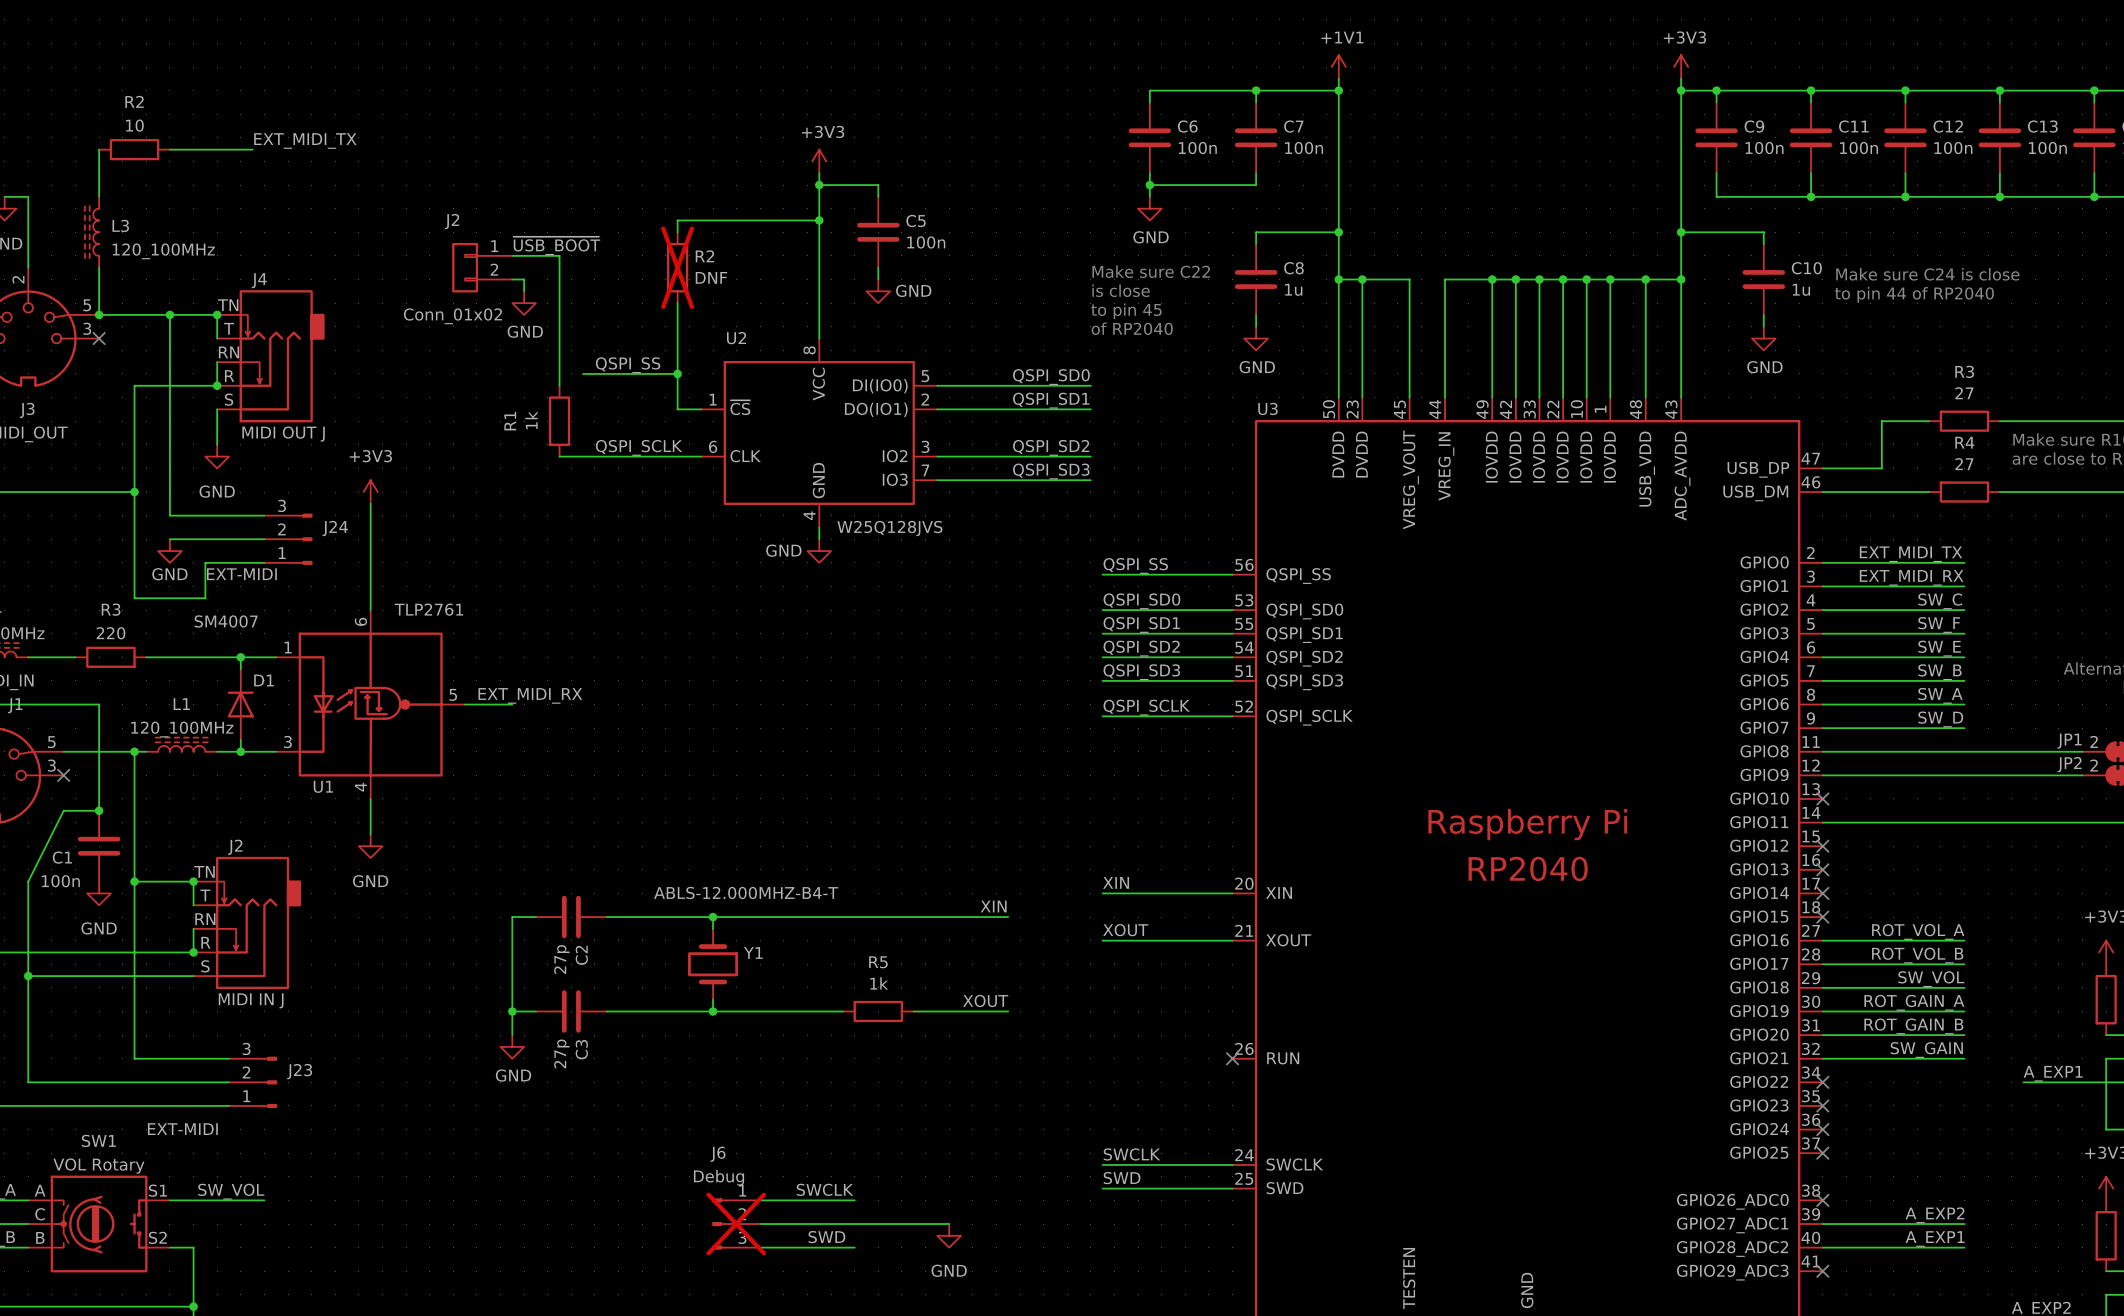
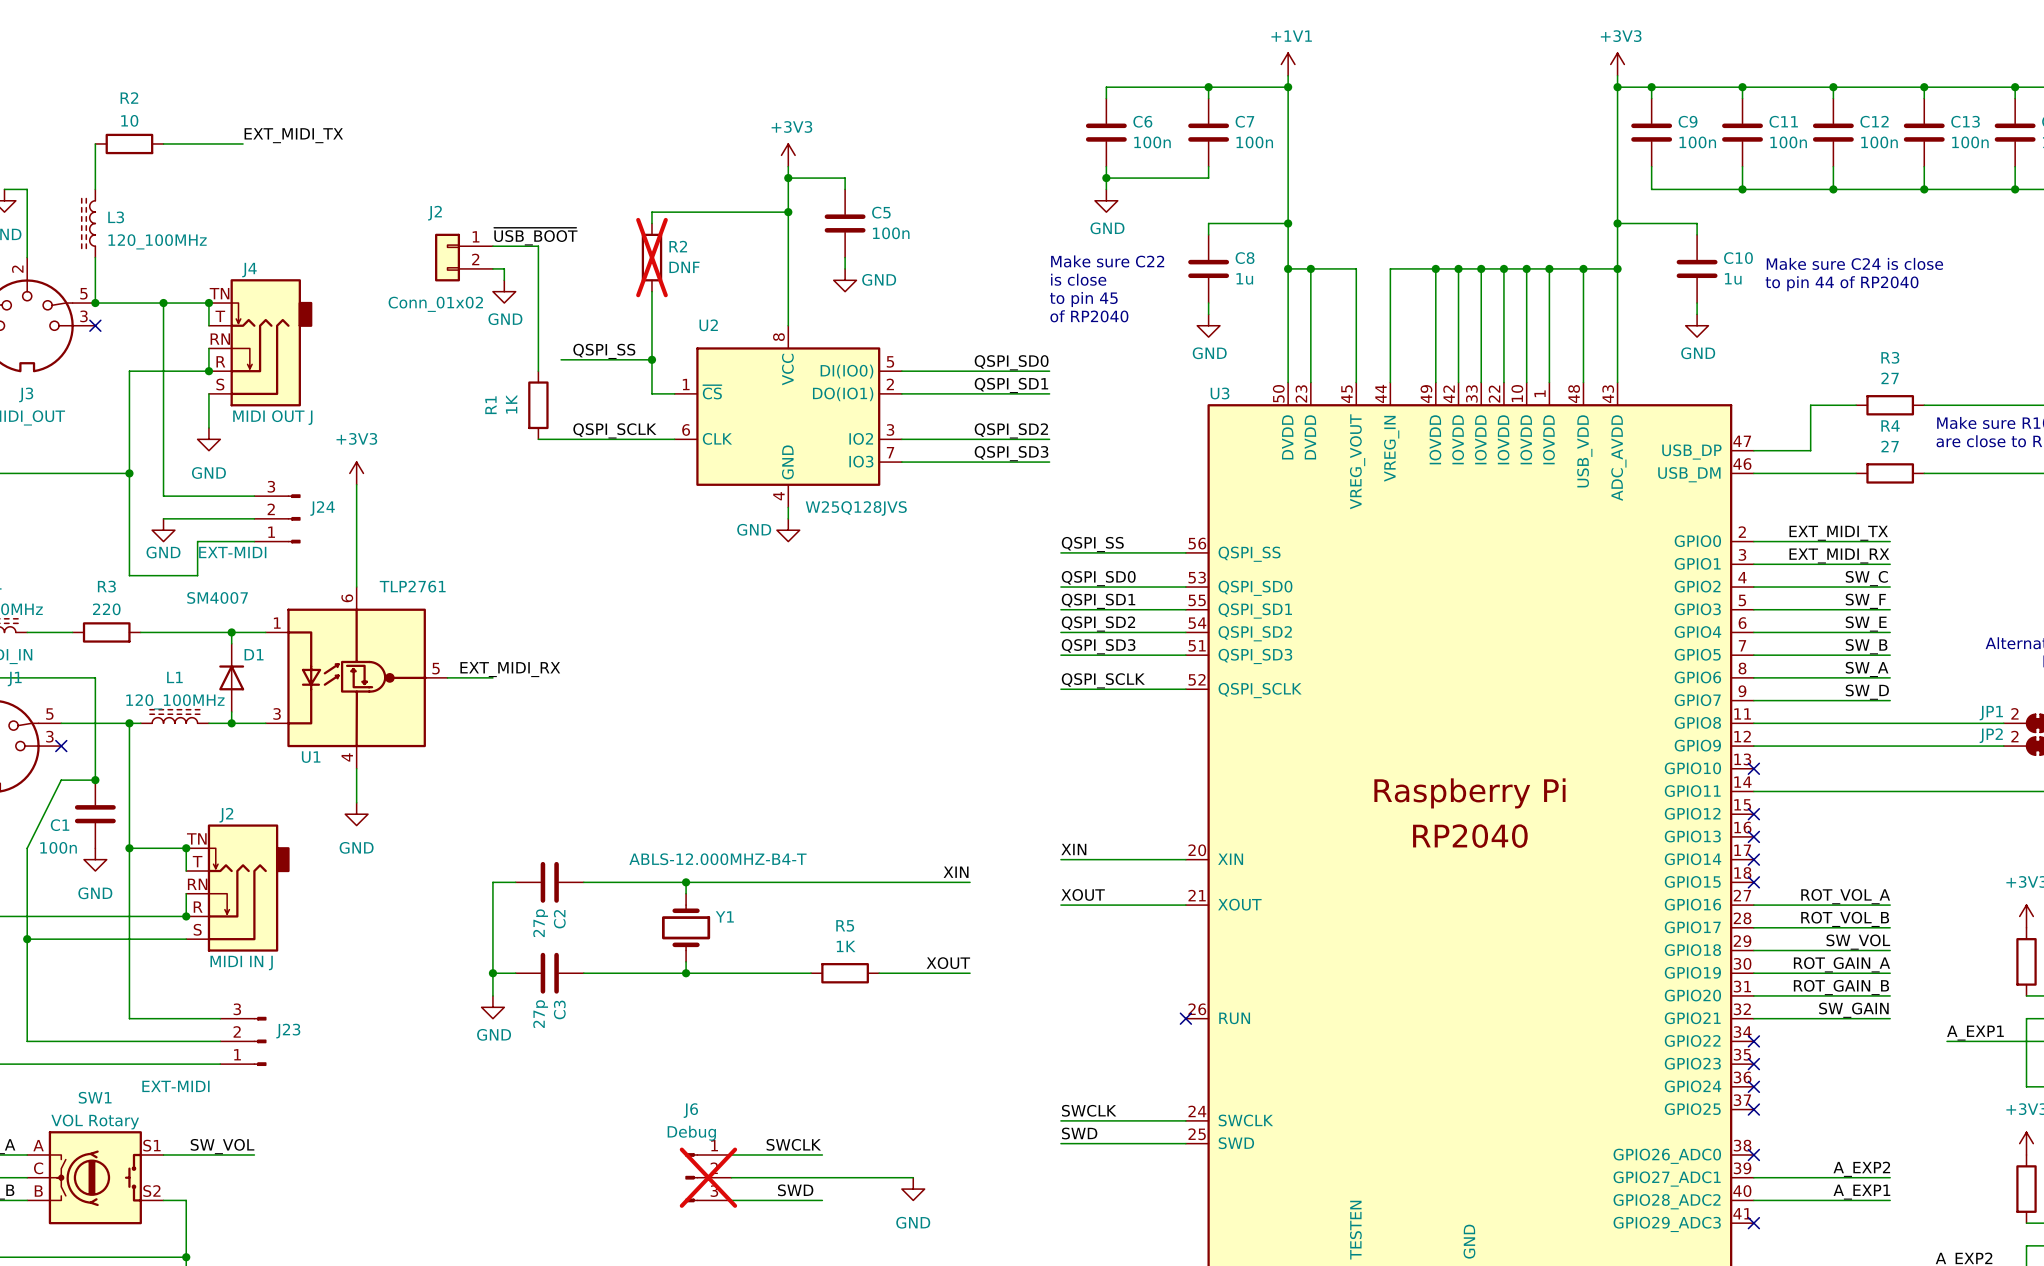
R1 value: 1k (531, 420) -> 1K (511, 404)
R5 value: 1k (879, 983) -> 1K (846, 946)

